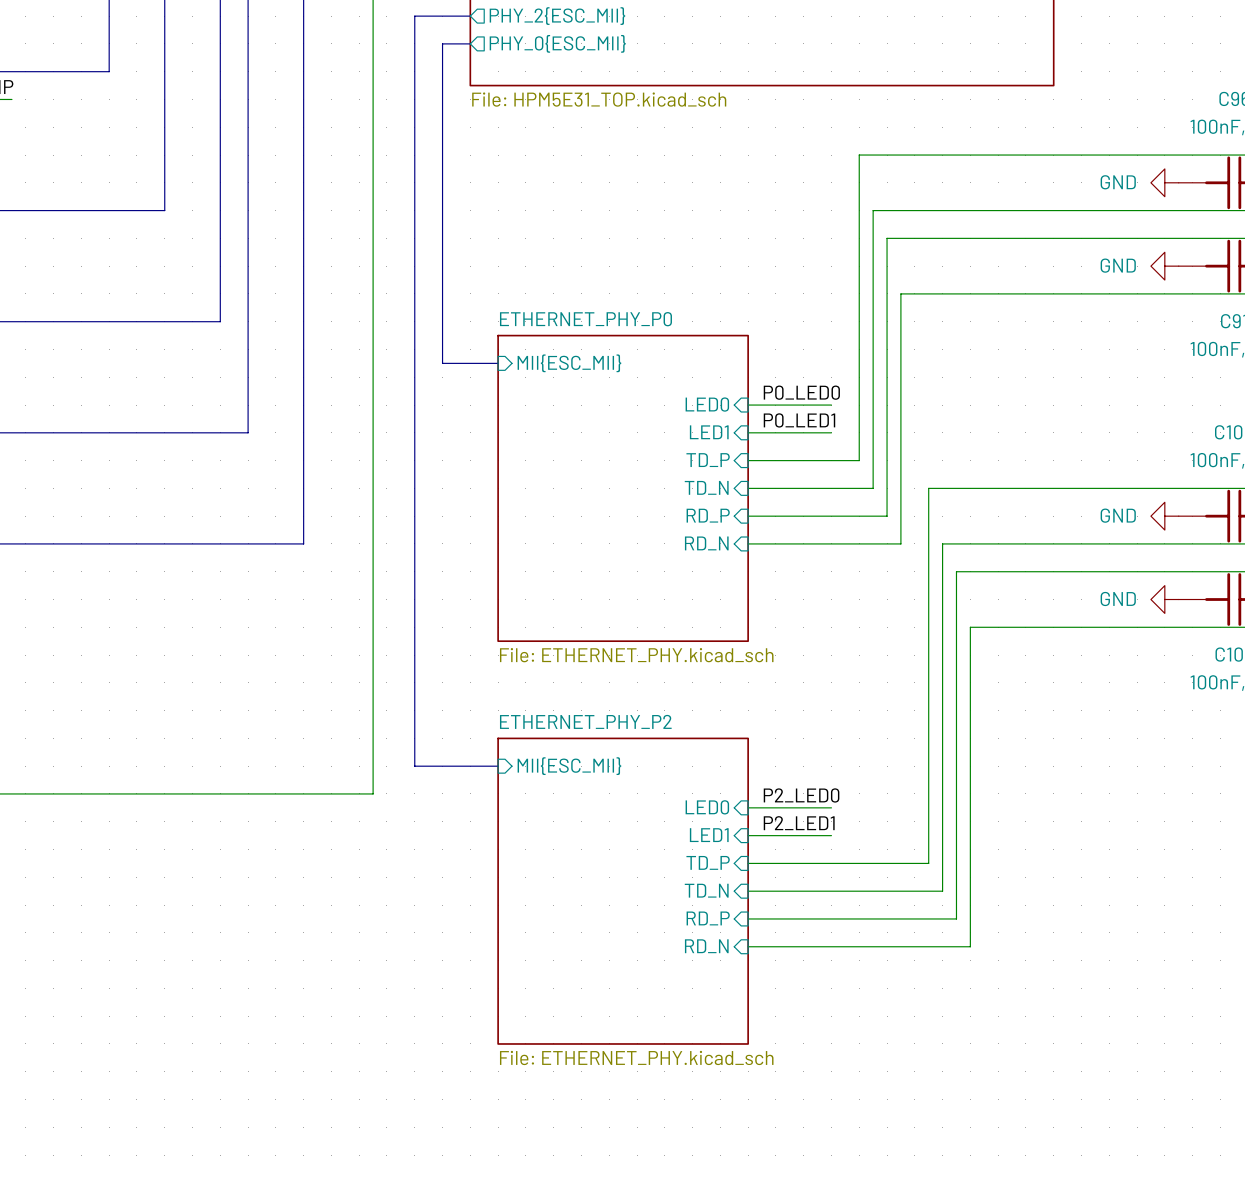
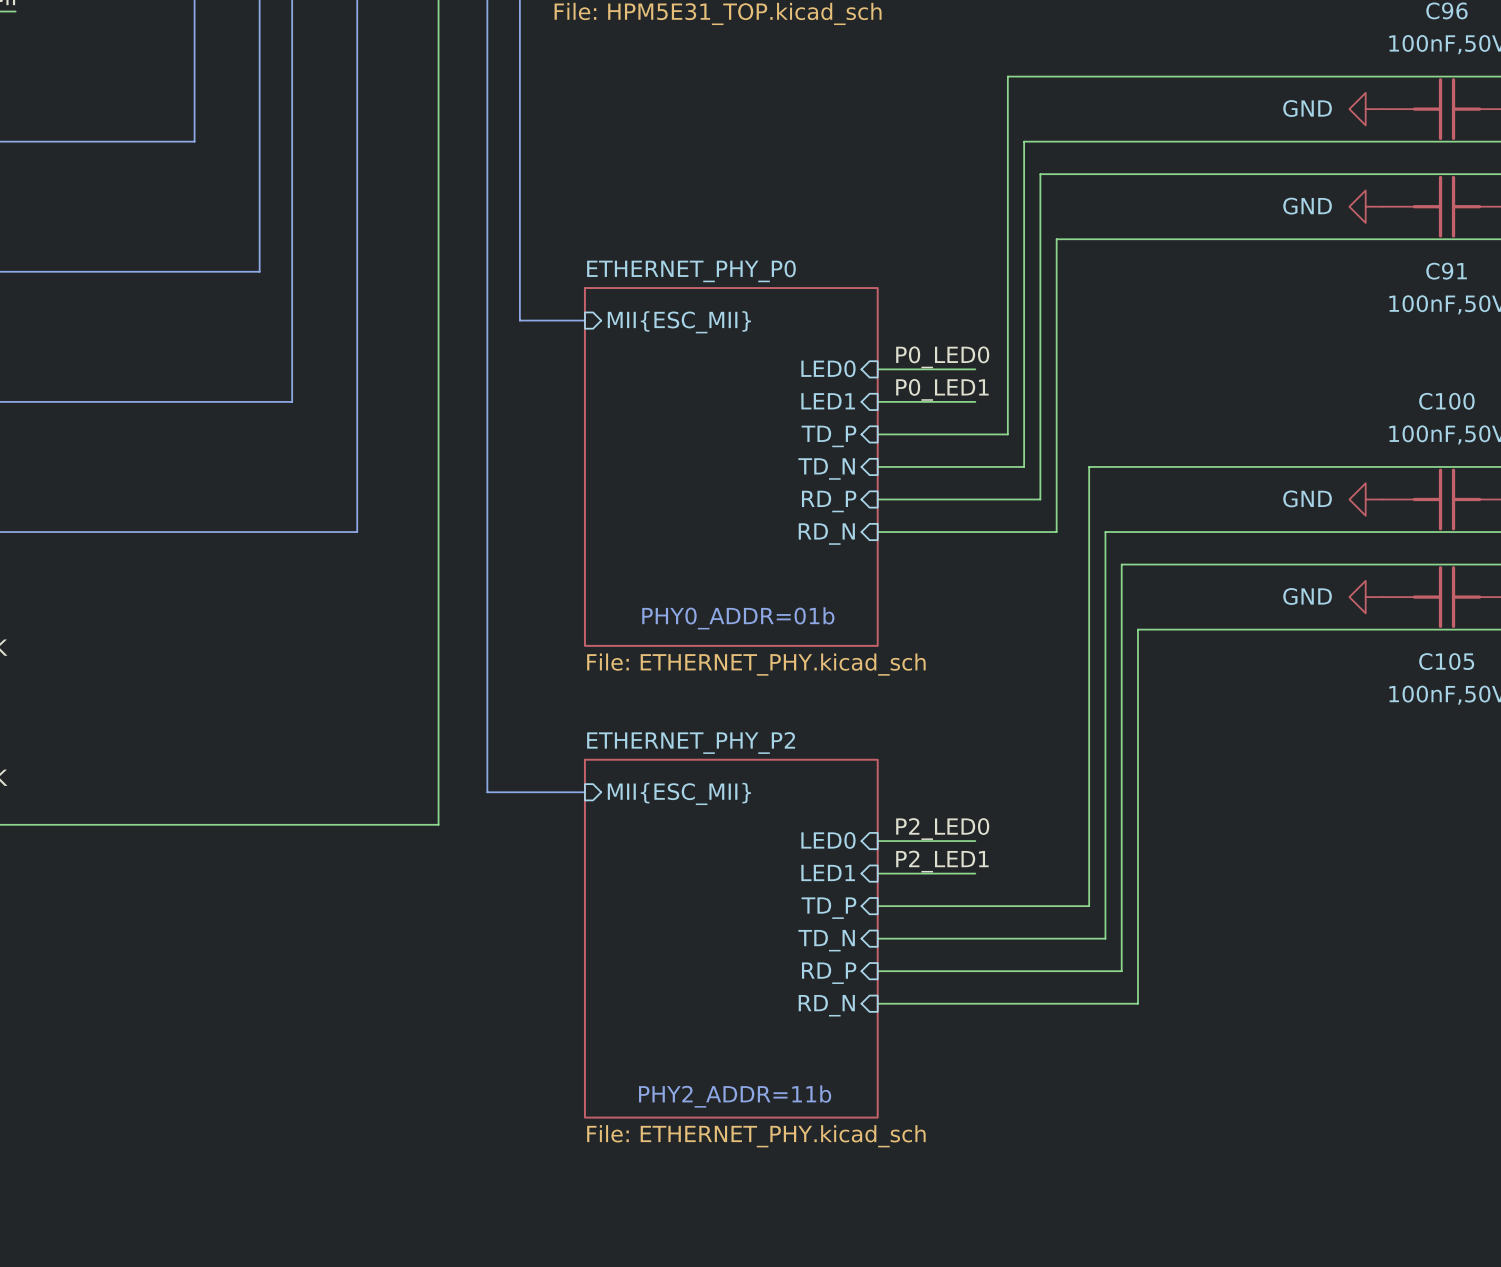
text: none -> PHY0_ADDR=01b (738, 618)
text: none -> PHY2_ADDR=11b (735, 1096)

